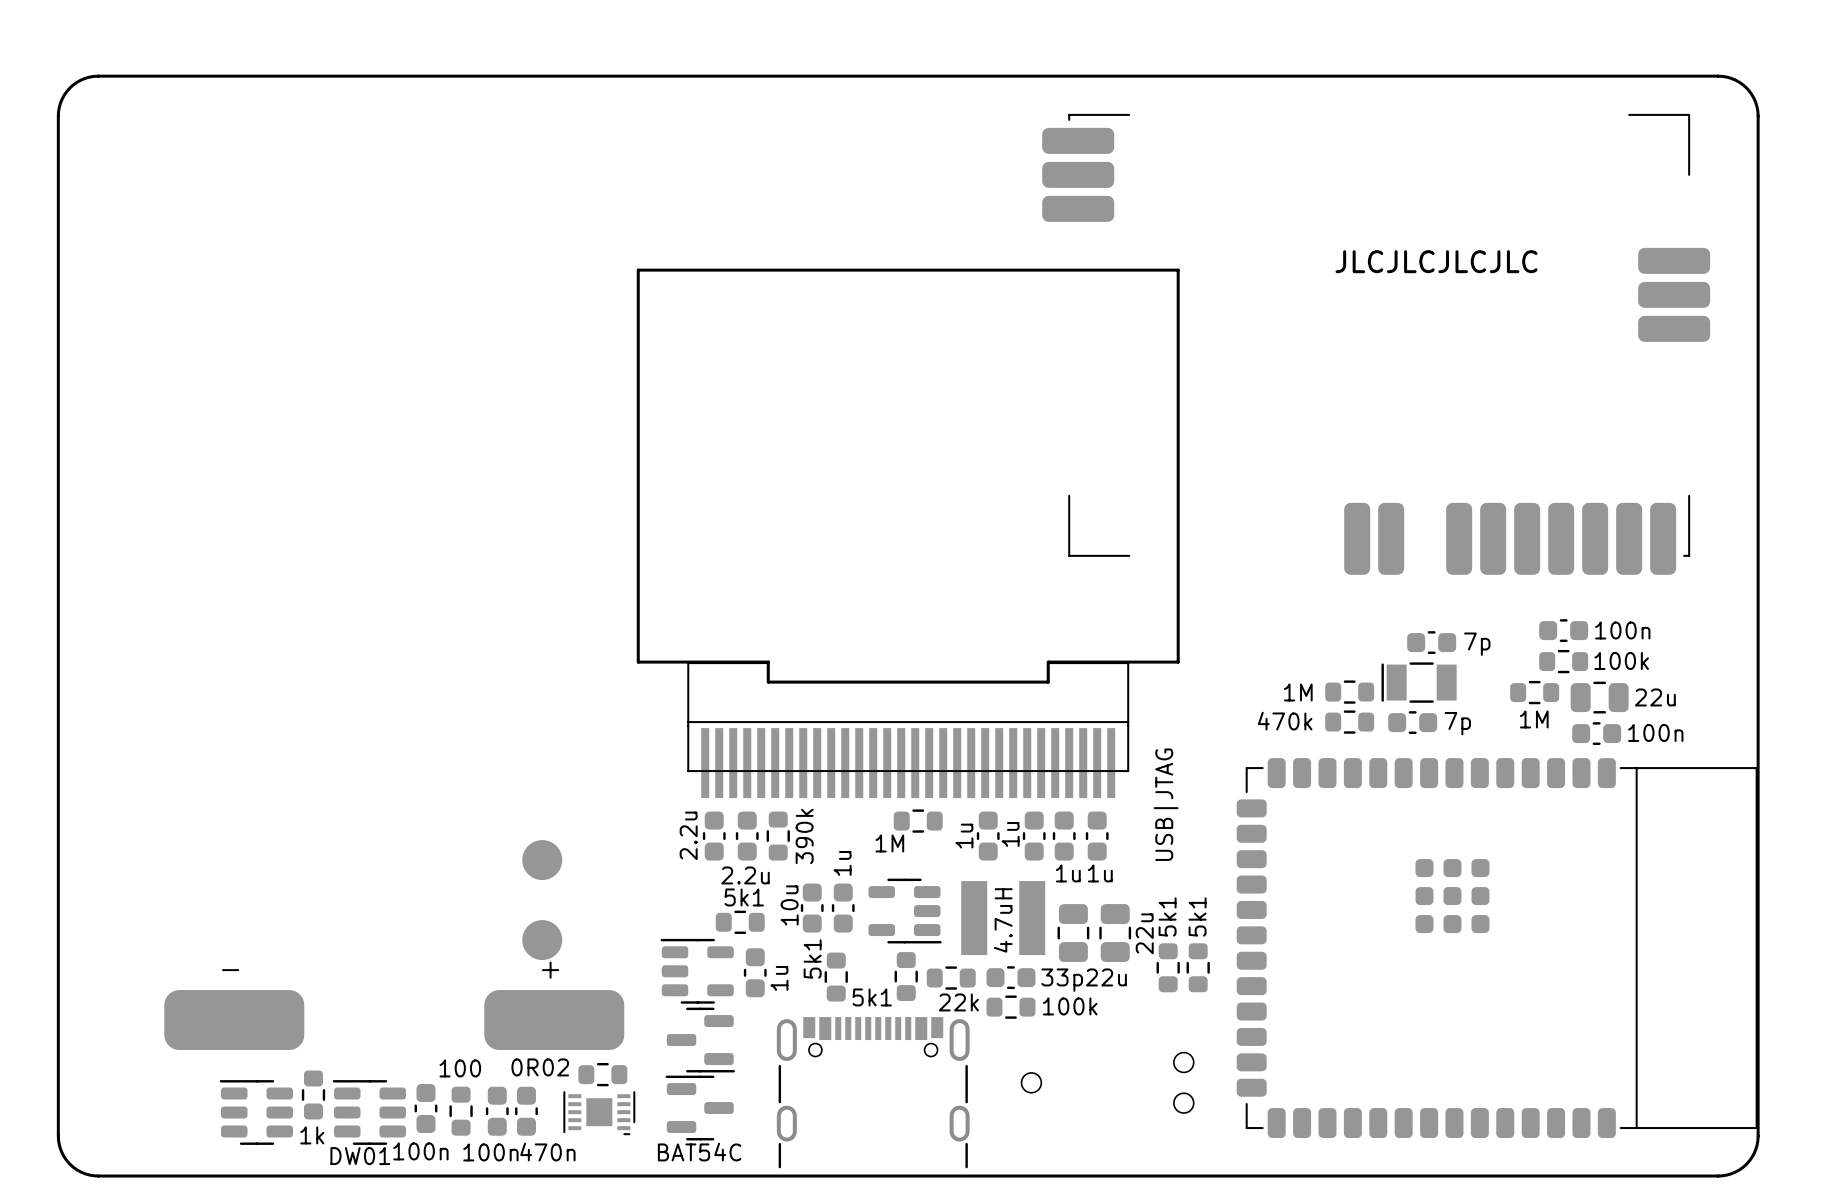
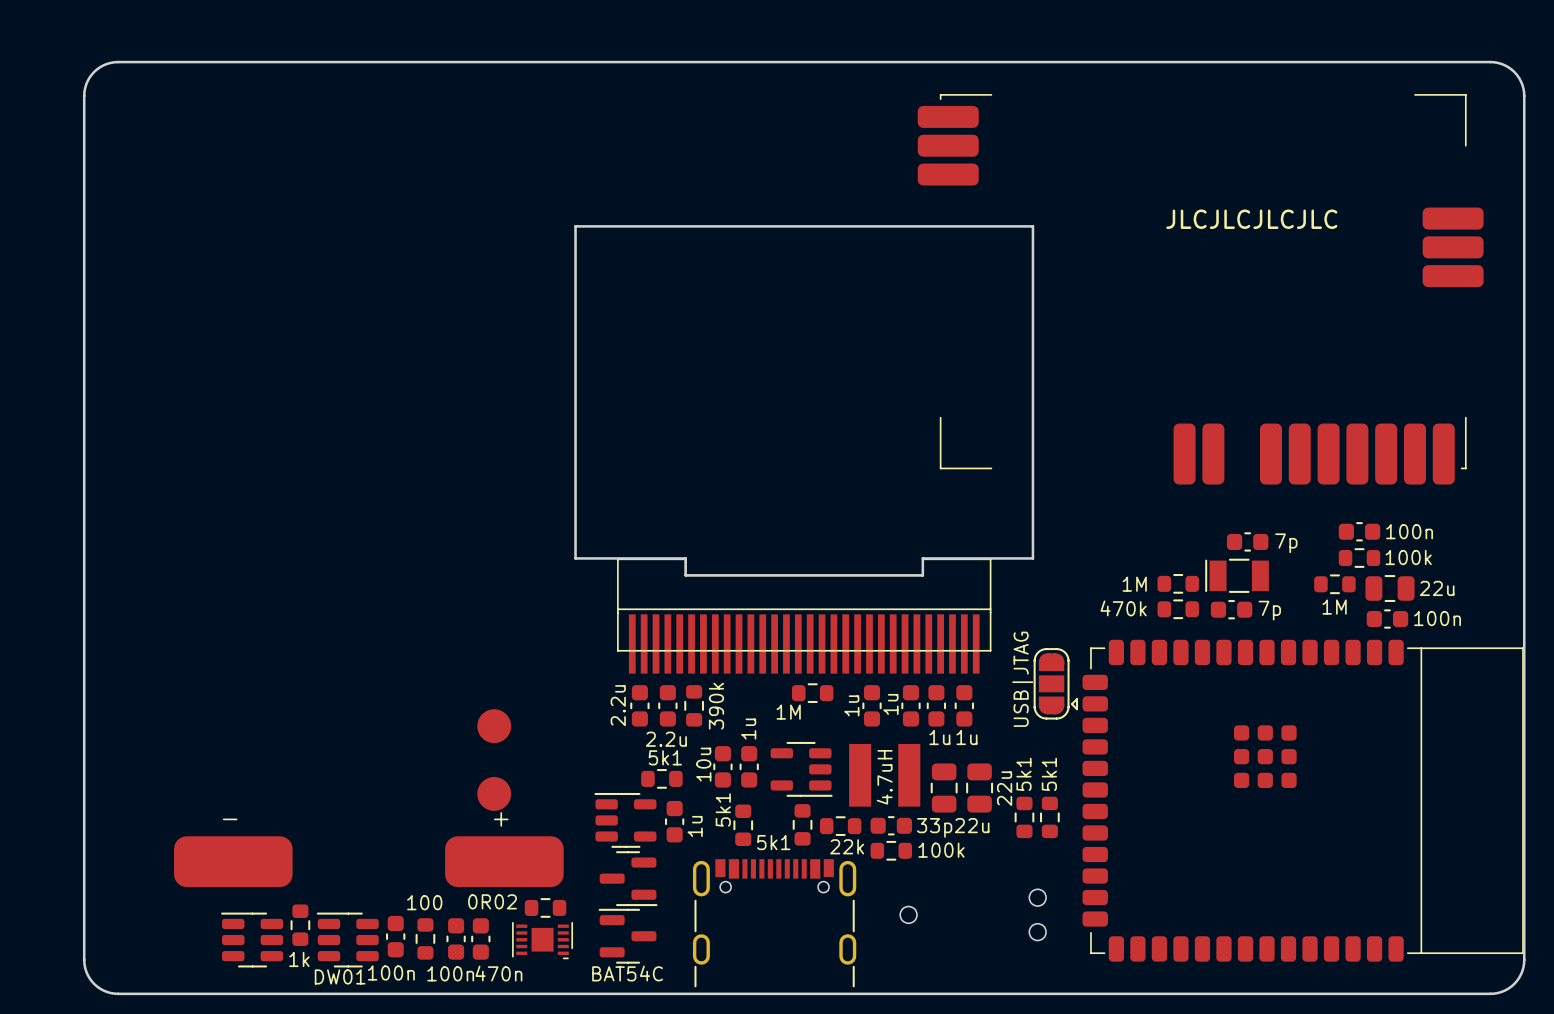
part: none -> (1055, 683)

